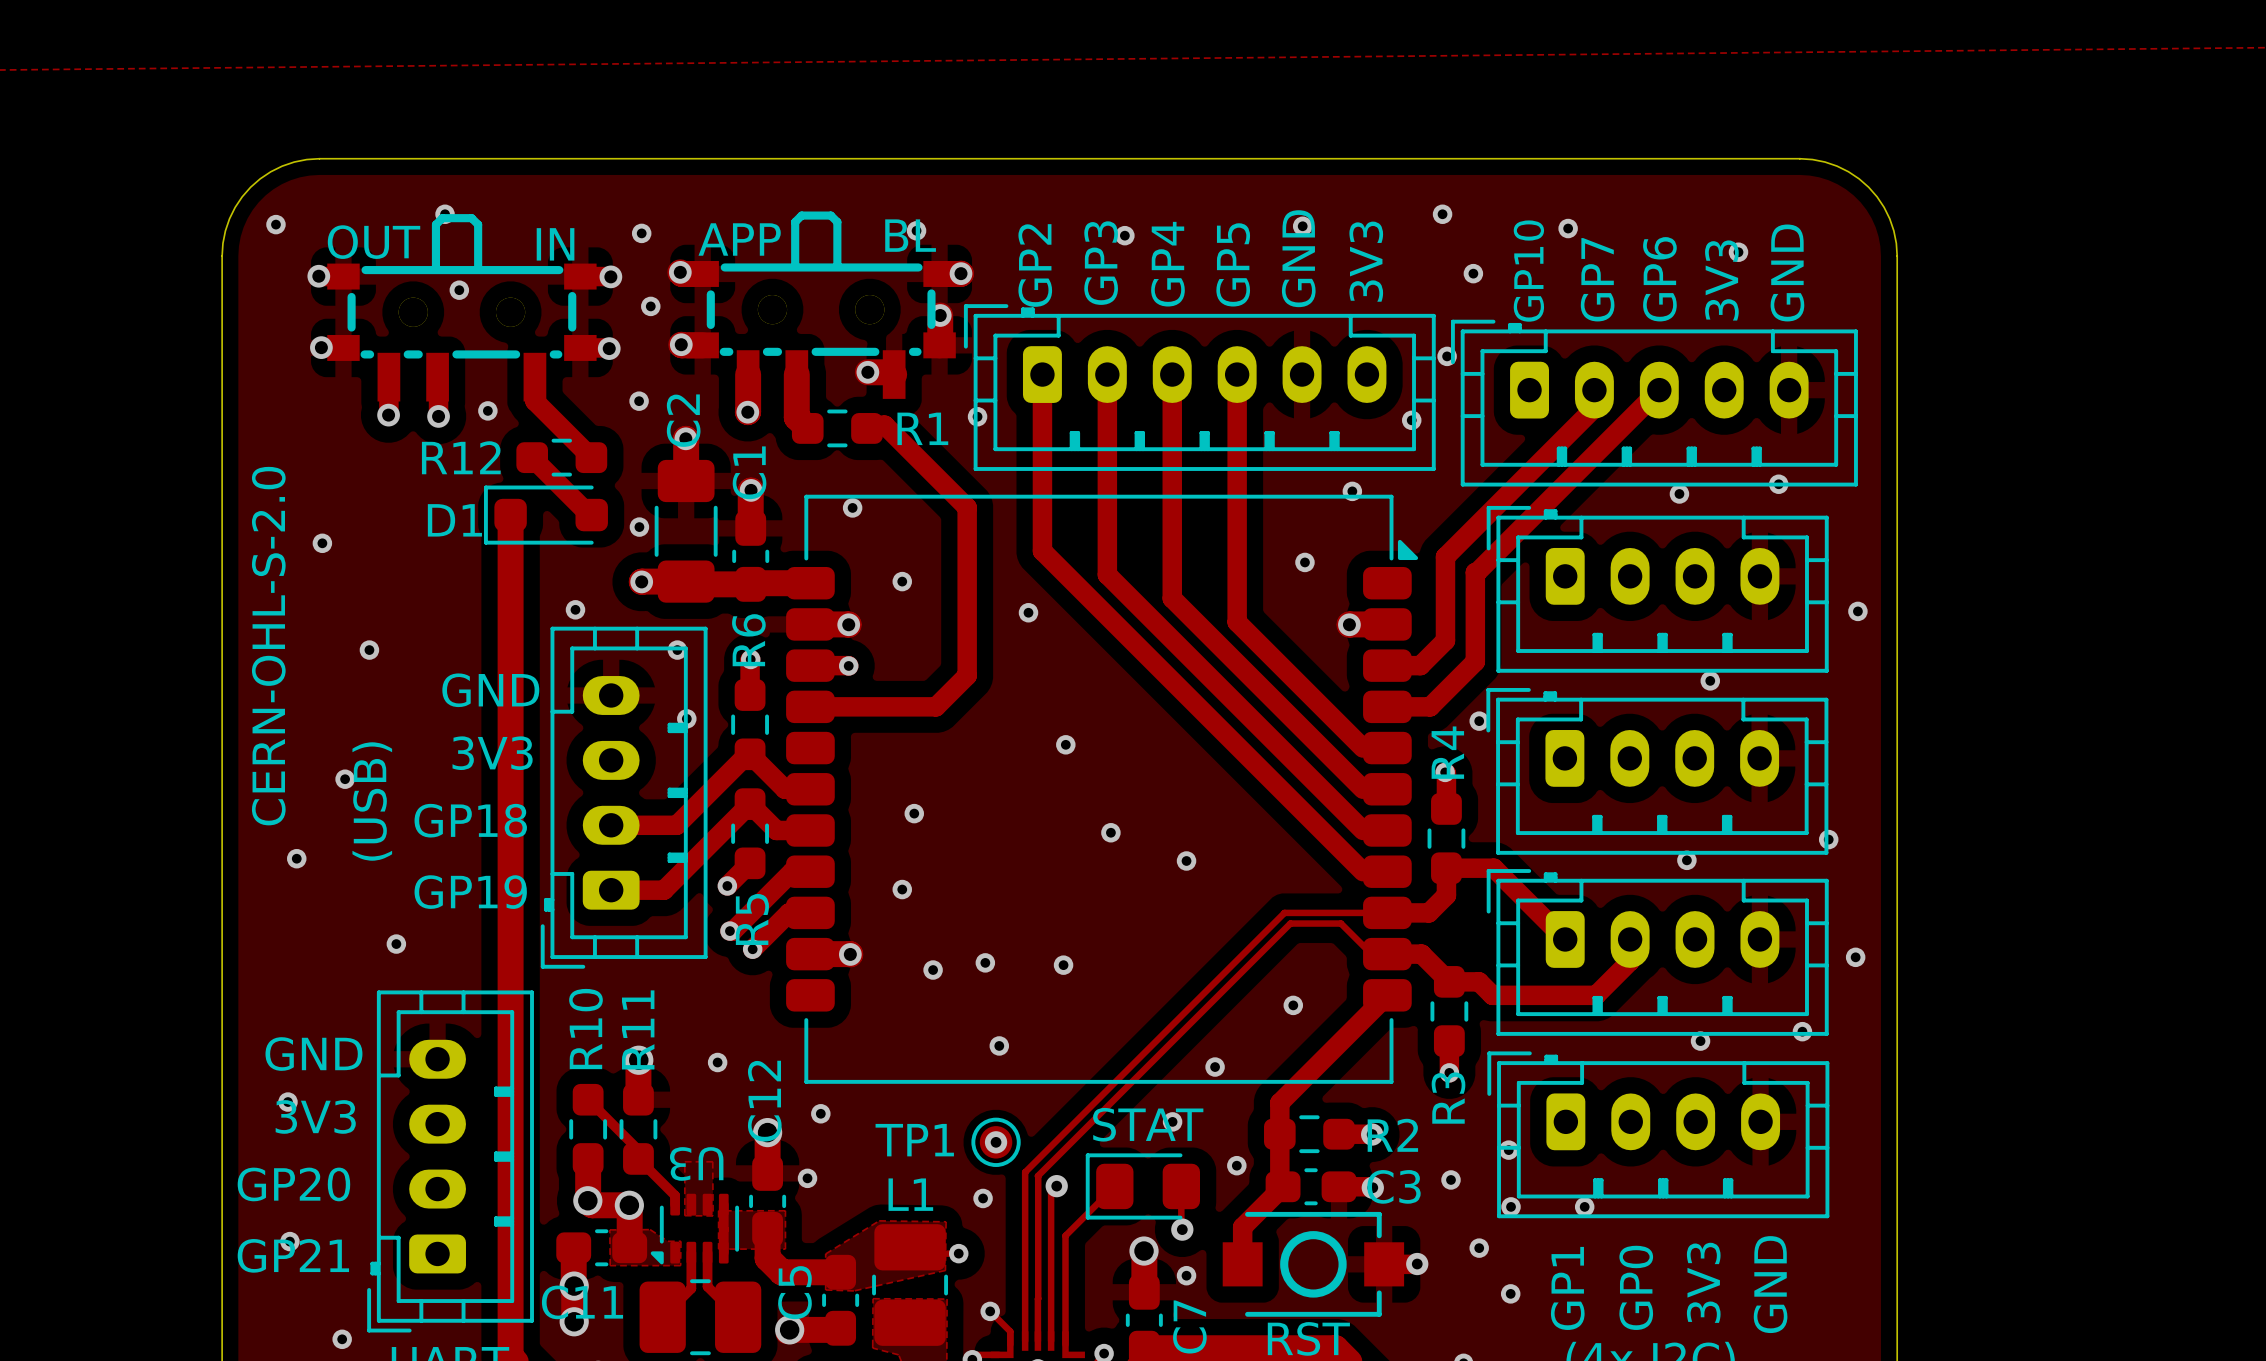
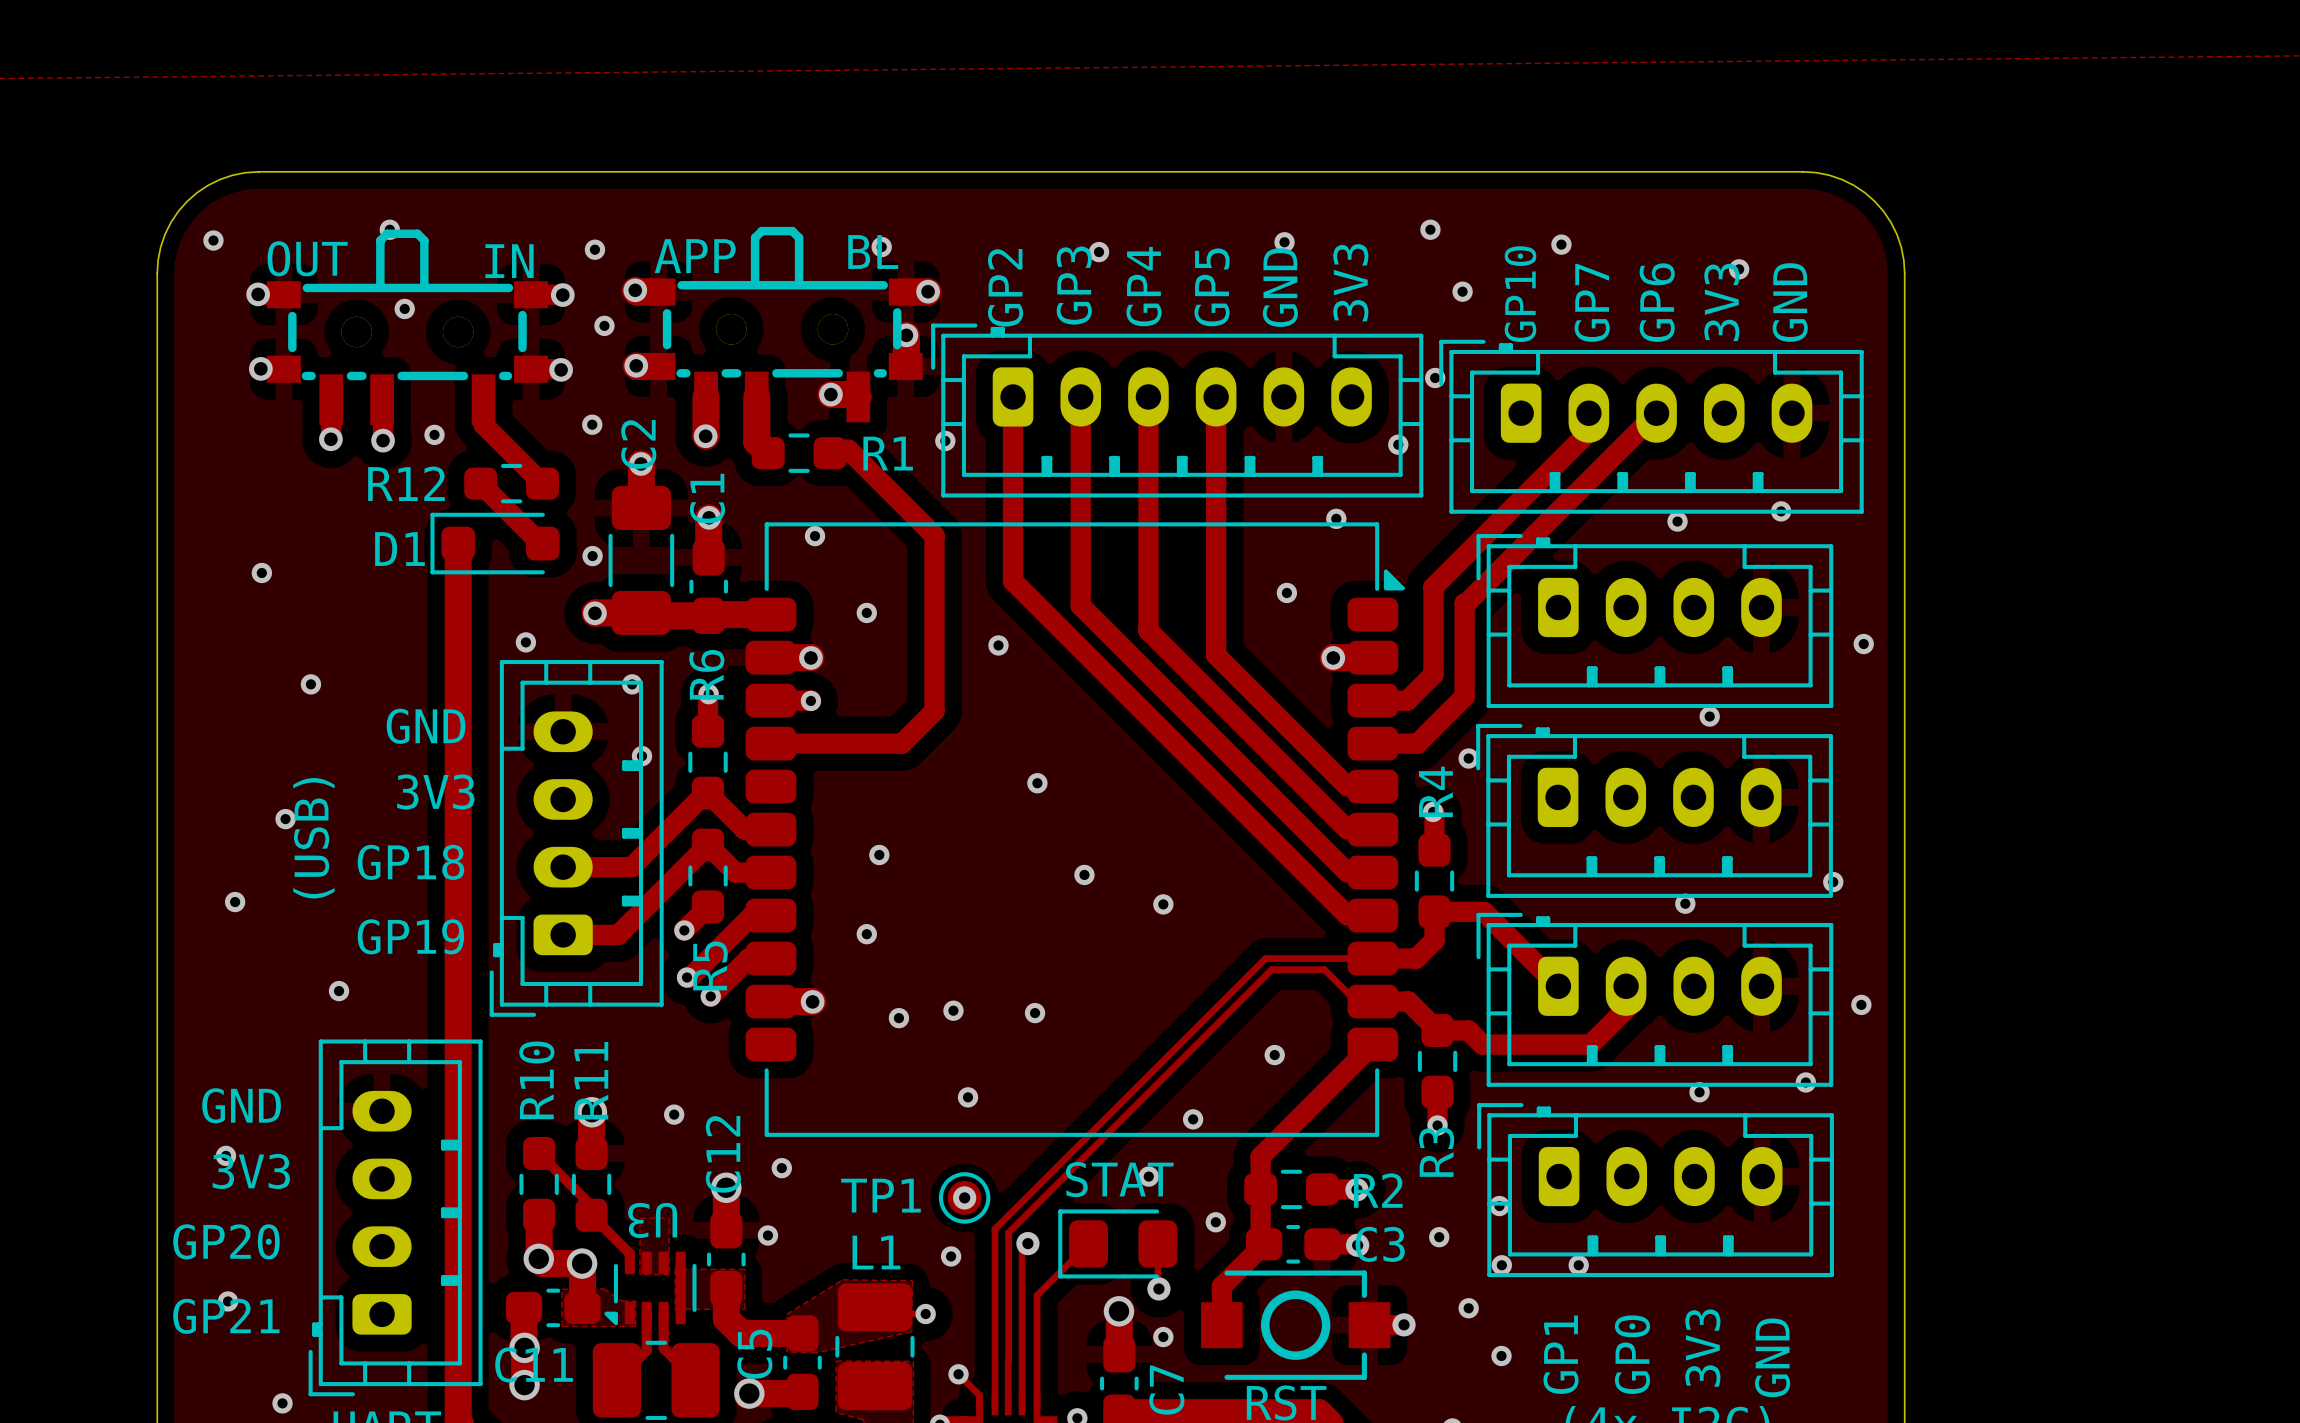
text: CERN-OHL-S-2.0 (268, 646) -> none

